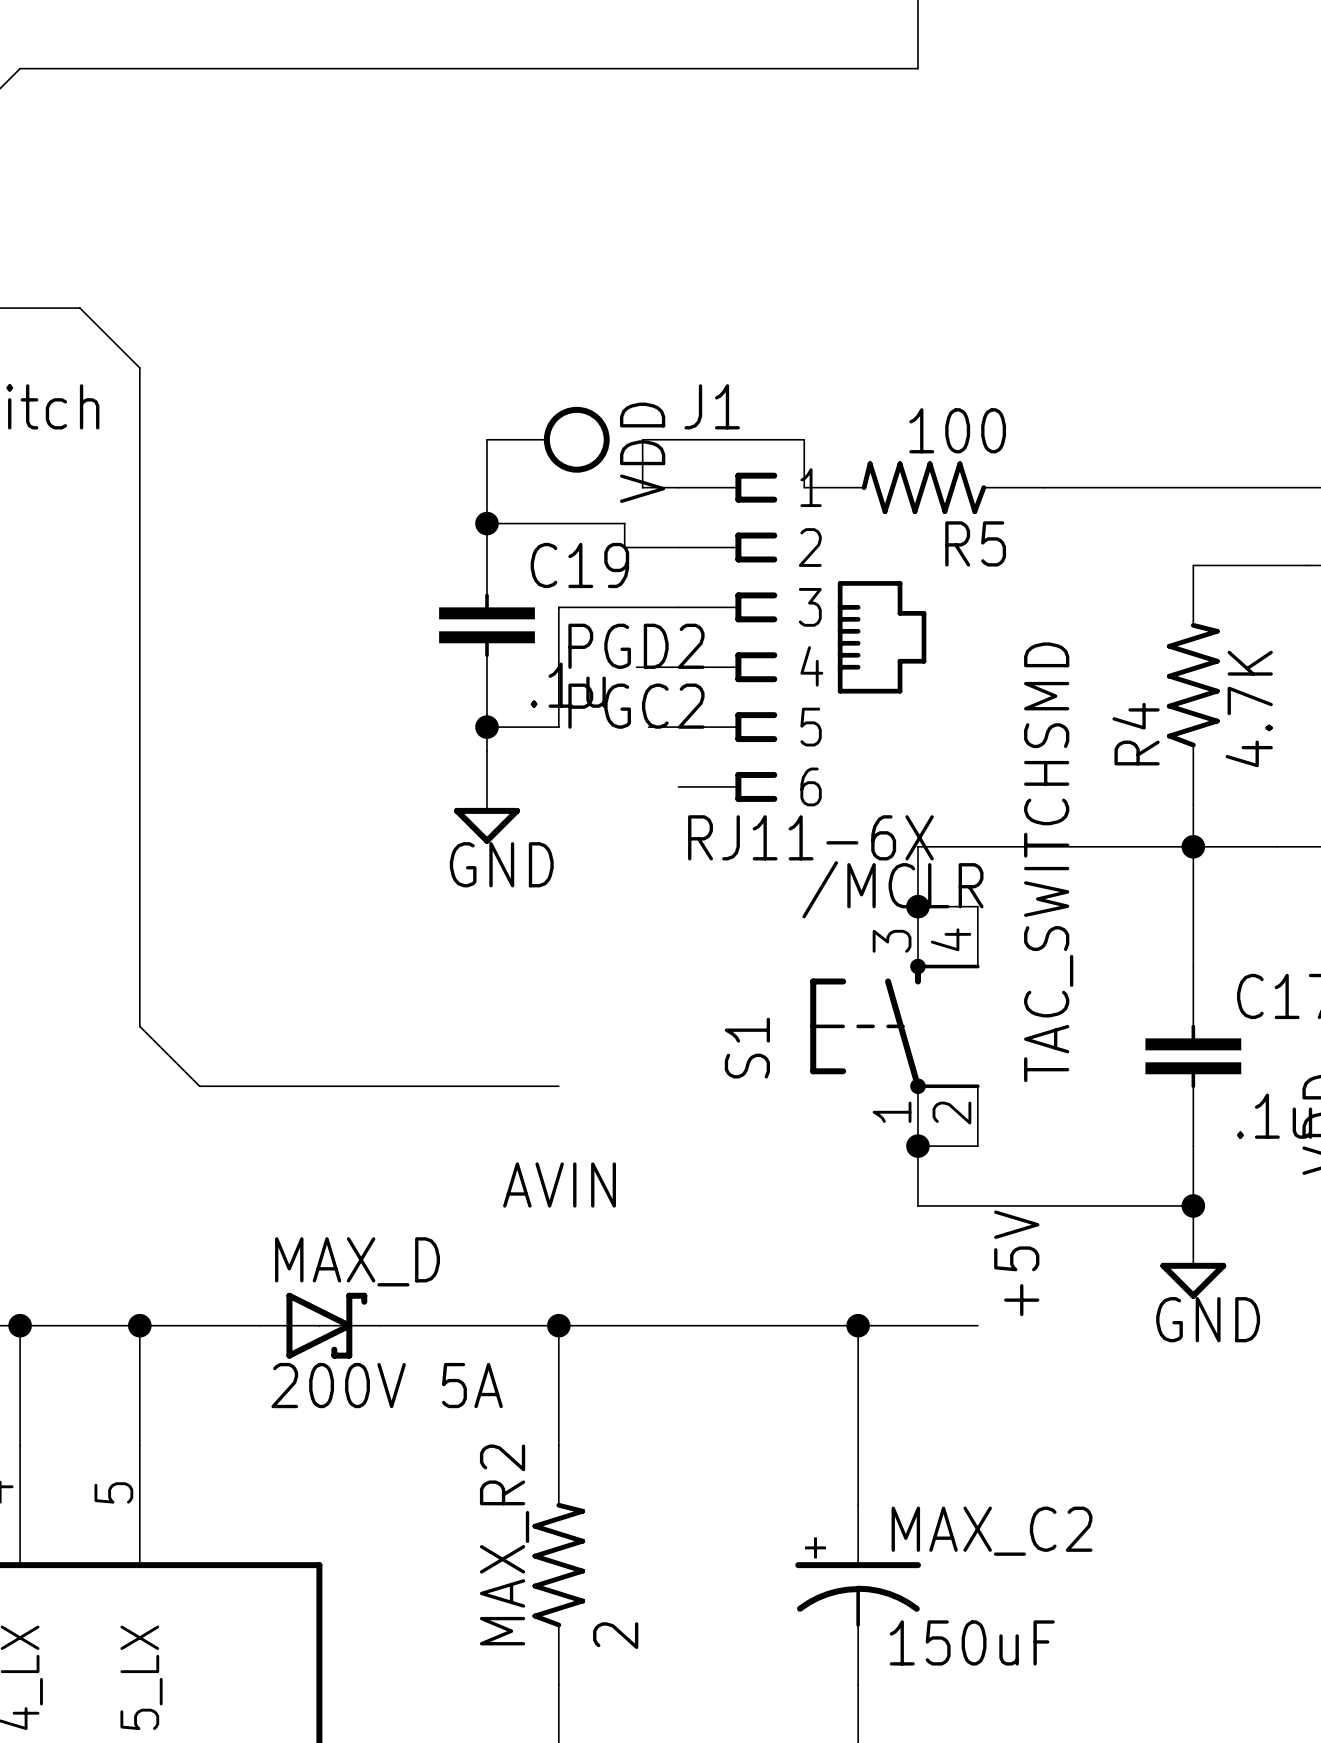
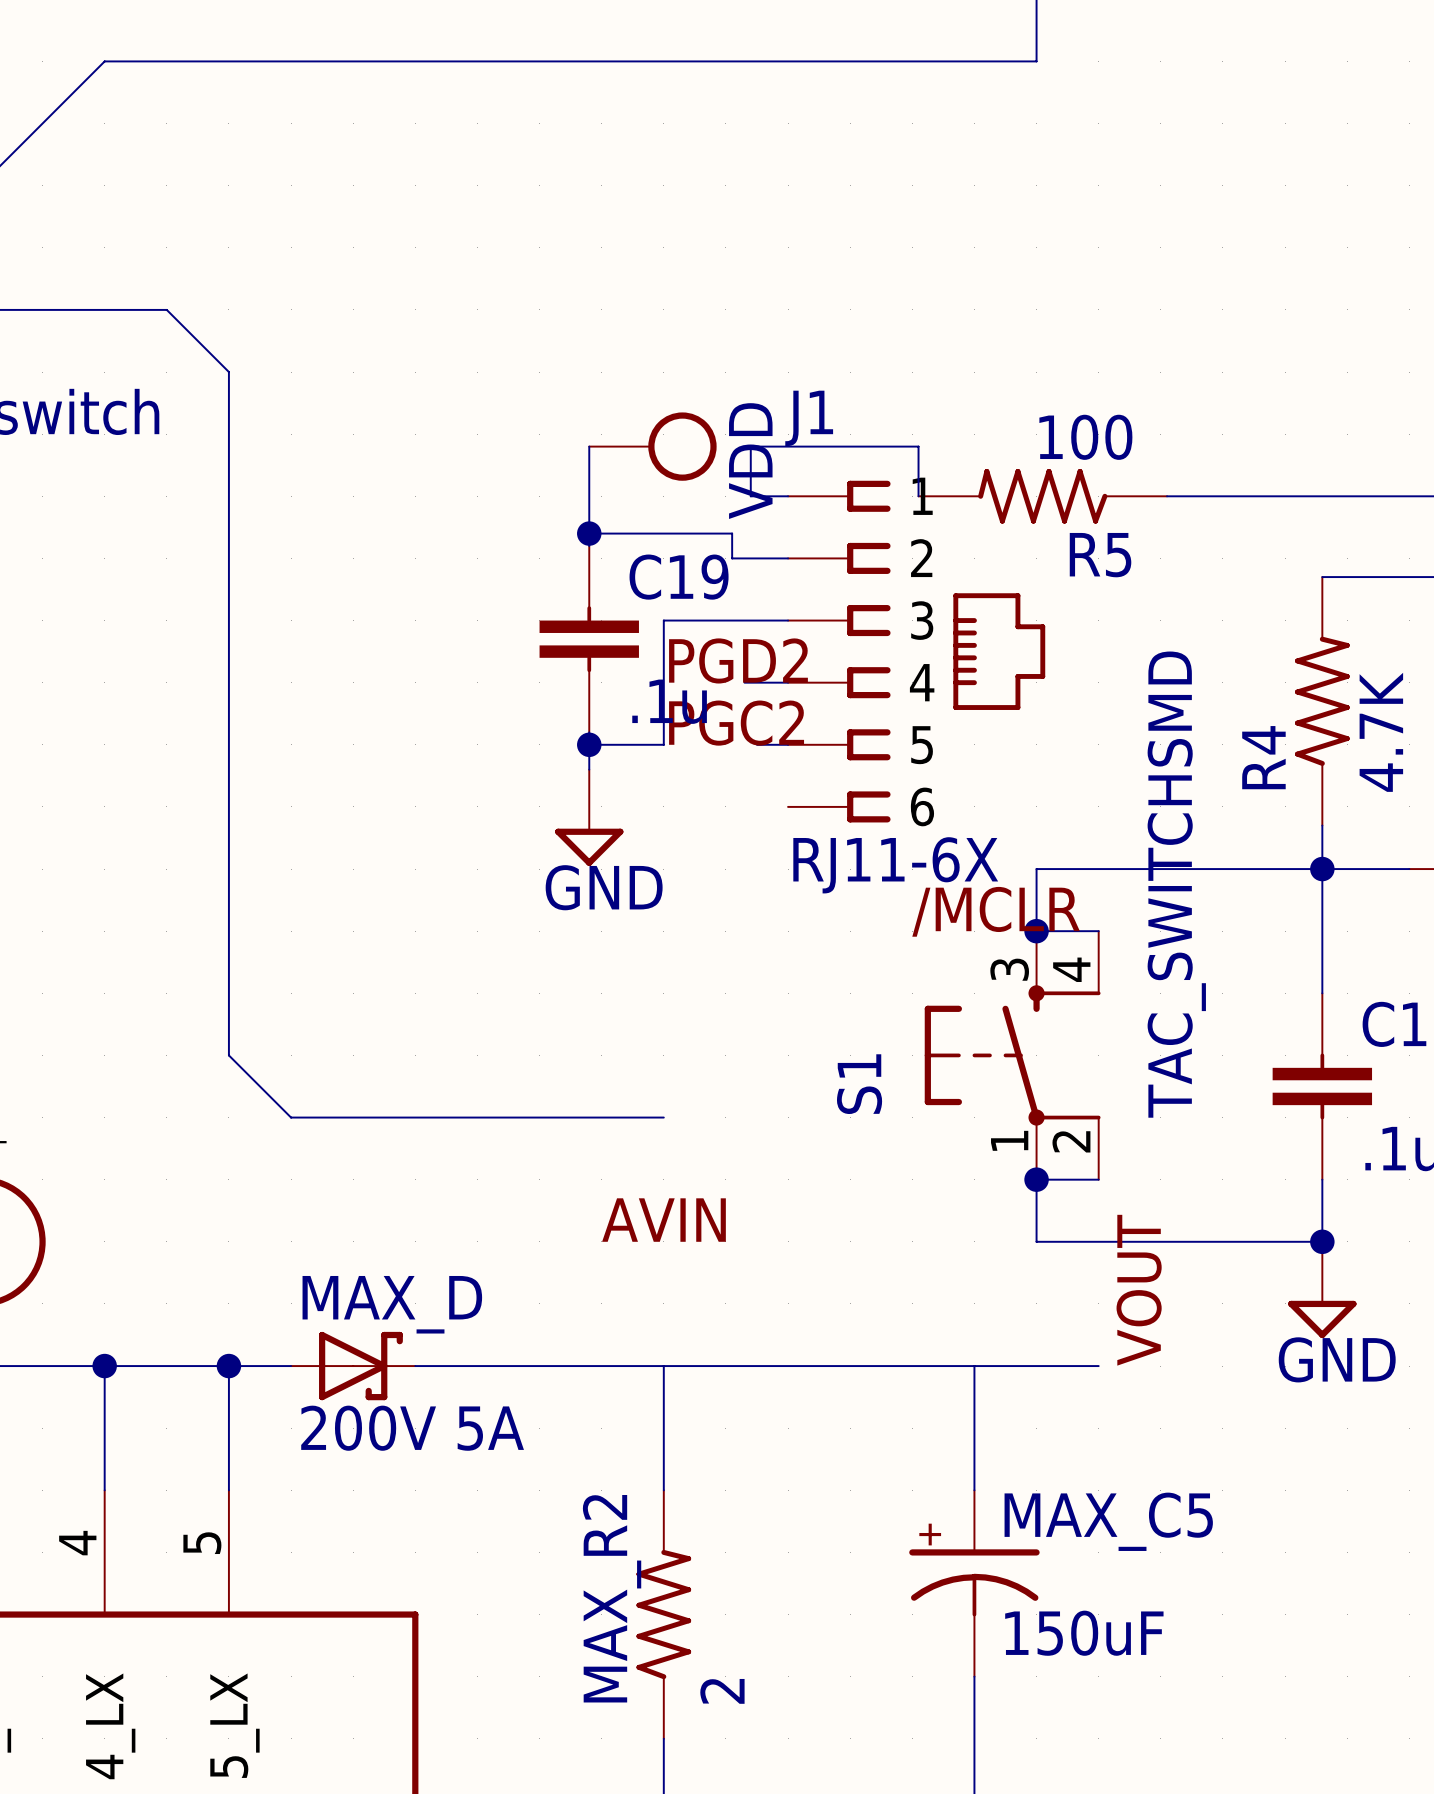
label: +5V (1016, 1263) -> VOUT (1139, 1290)
MAX_D position: (319, 1325) -> (353, 1366)
junction: (558, 1325) -> none
junction: (858, 1325) -> none
MAX_C5: none -> 150uF (974, 1583)
MAX_C2: 150uF (858, 1595) -> none

